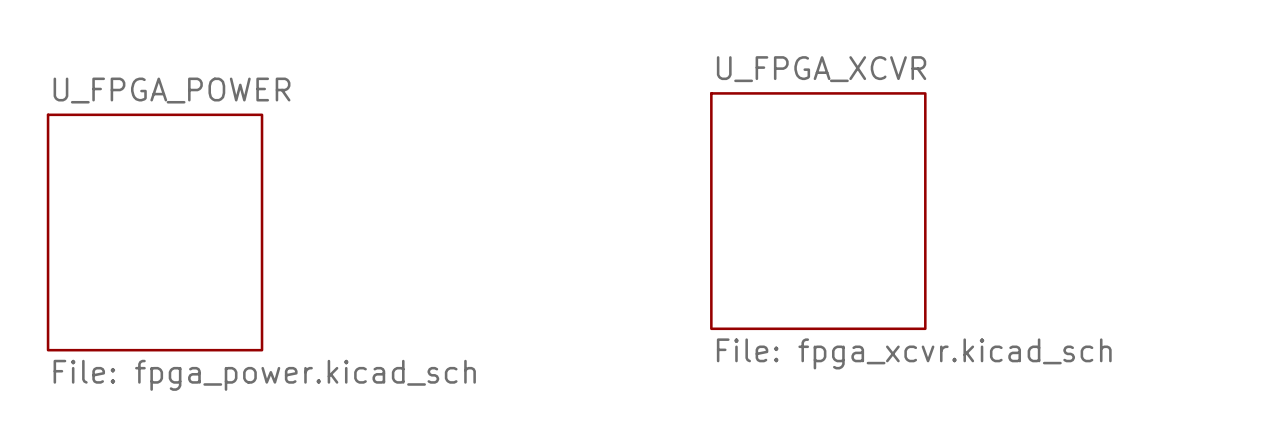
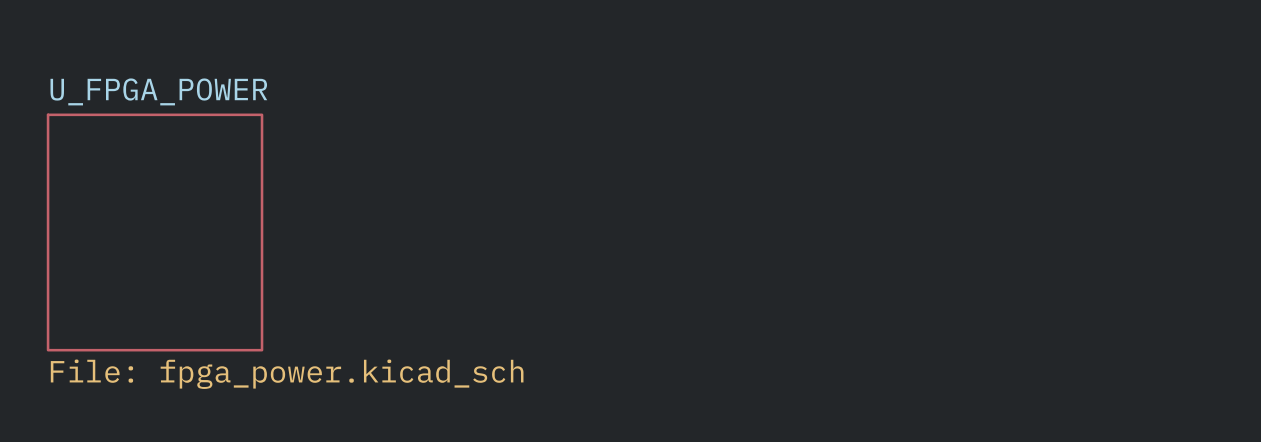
sheet U_FPGA_XCVR: File: fpga_xcvr.kicad_sch (818, 211) -> none

